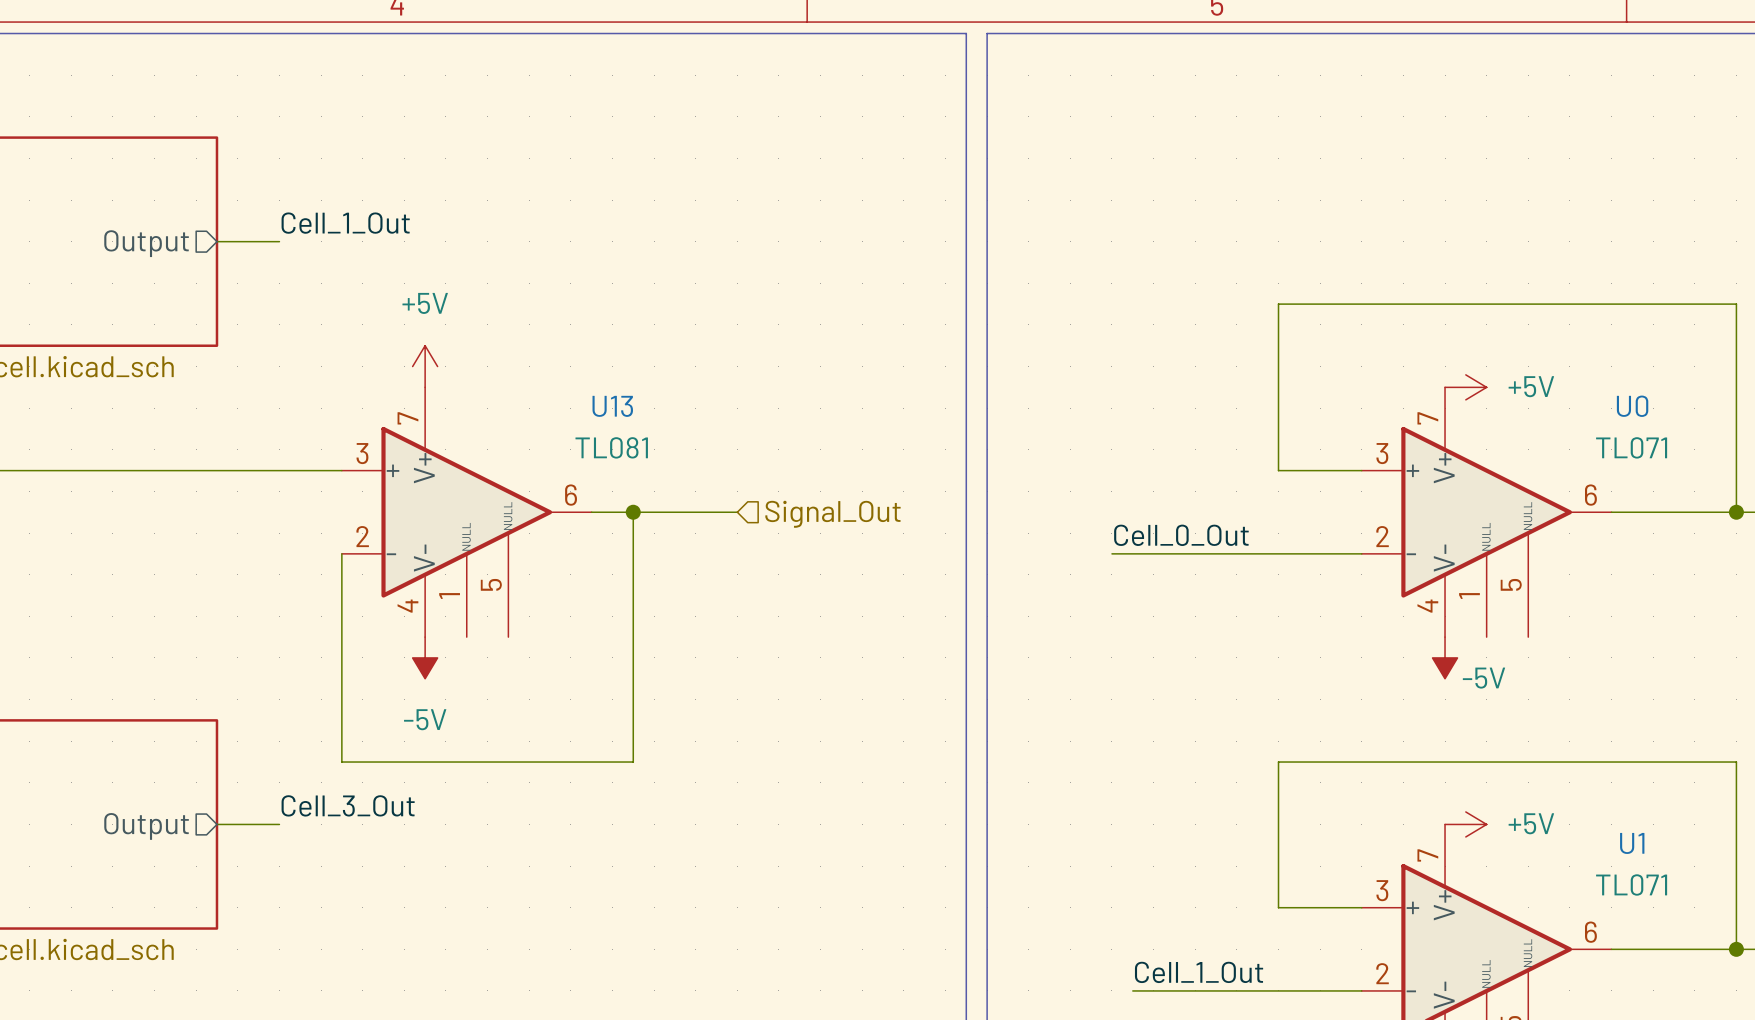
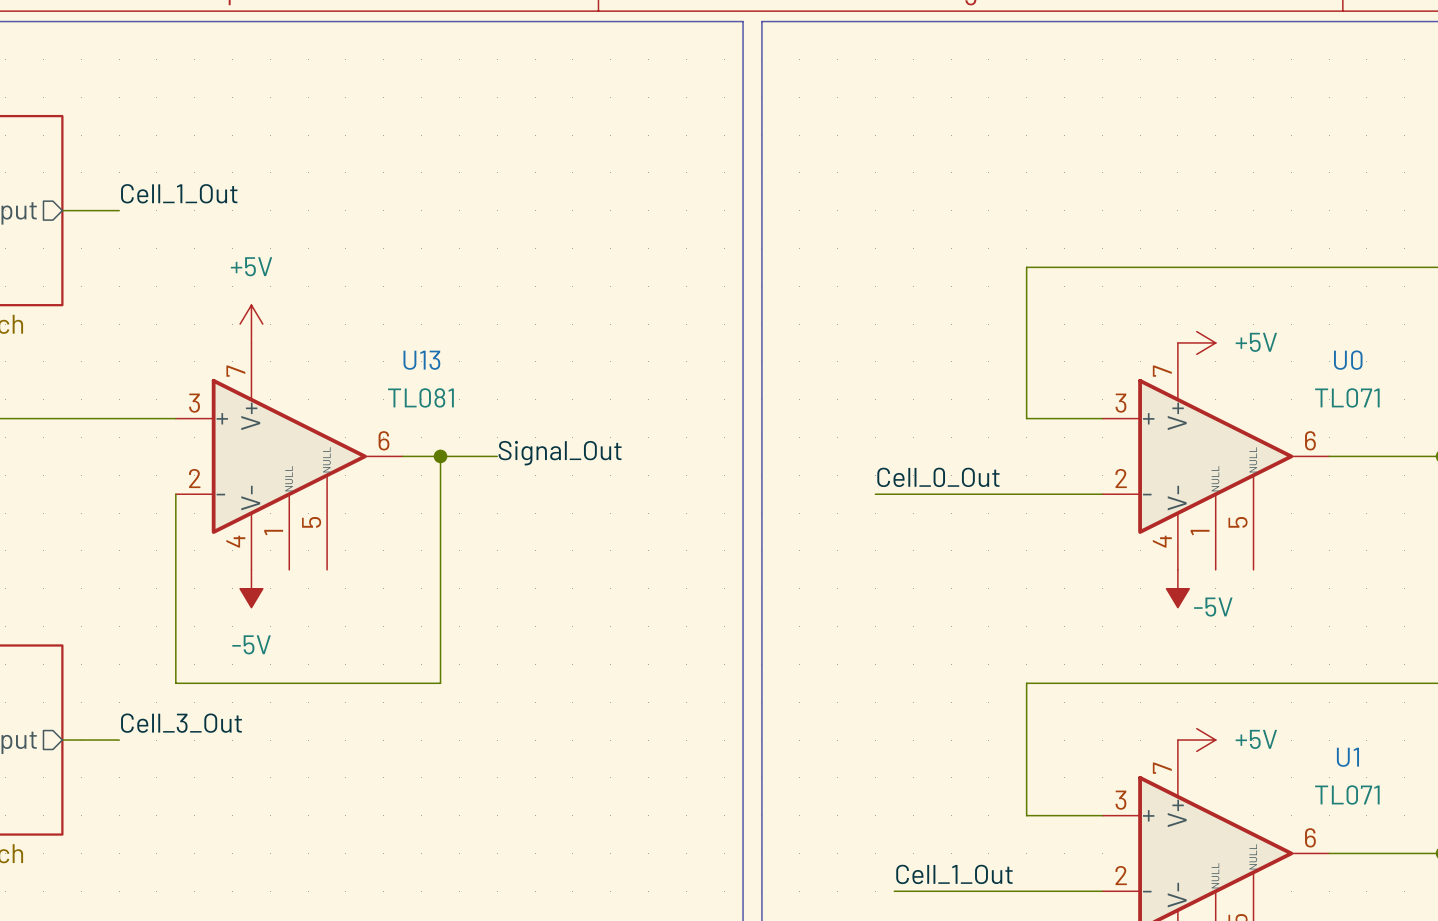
label: none -> Signal_Out (560, 453)
wire: (695, 512) (737, 512) -> none
hierarchical label: Signal_Out (832, 514) -> none

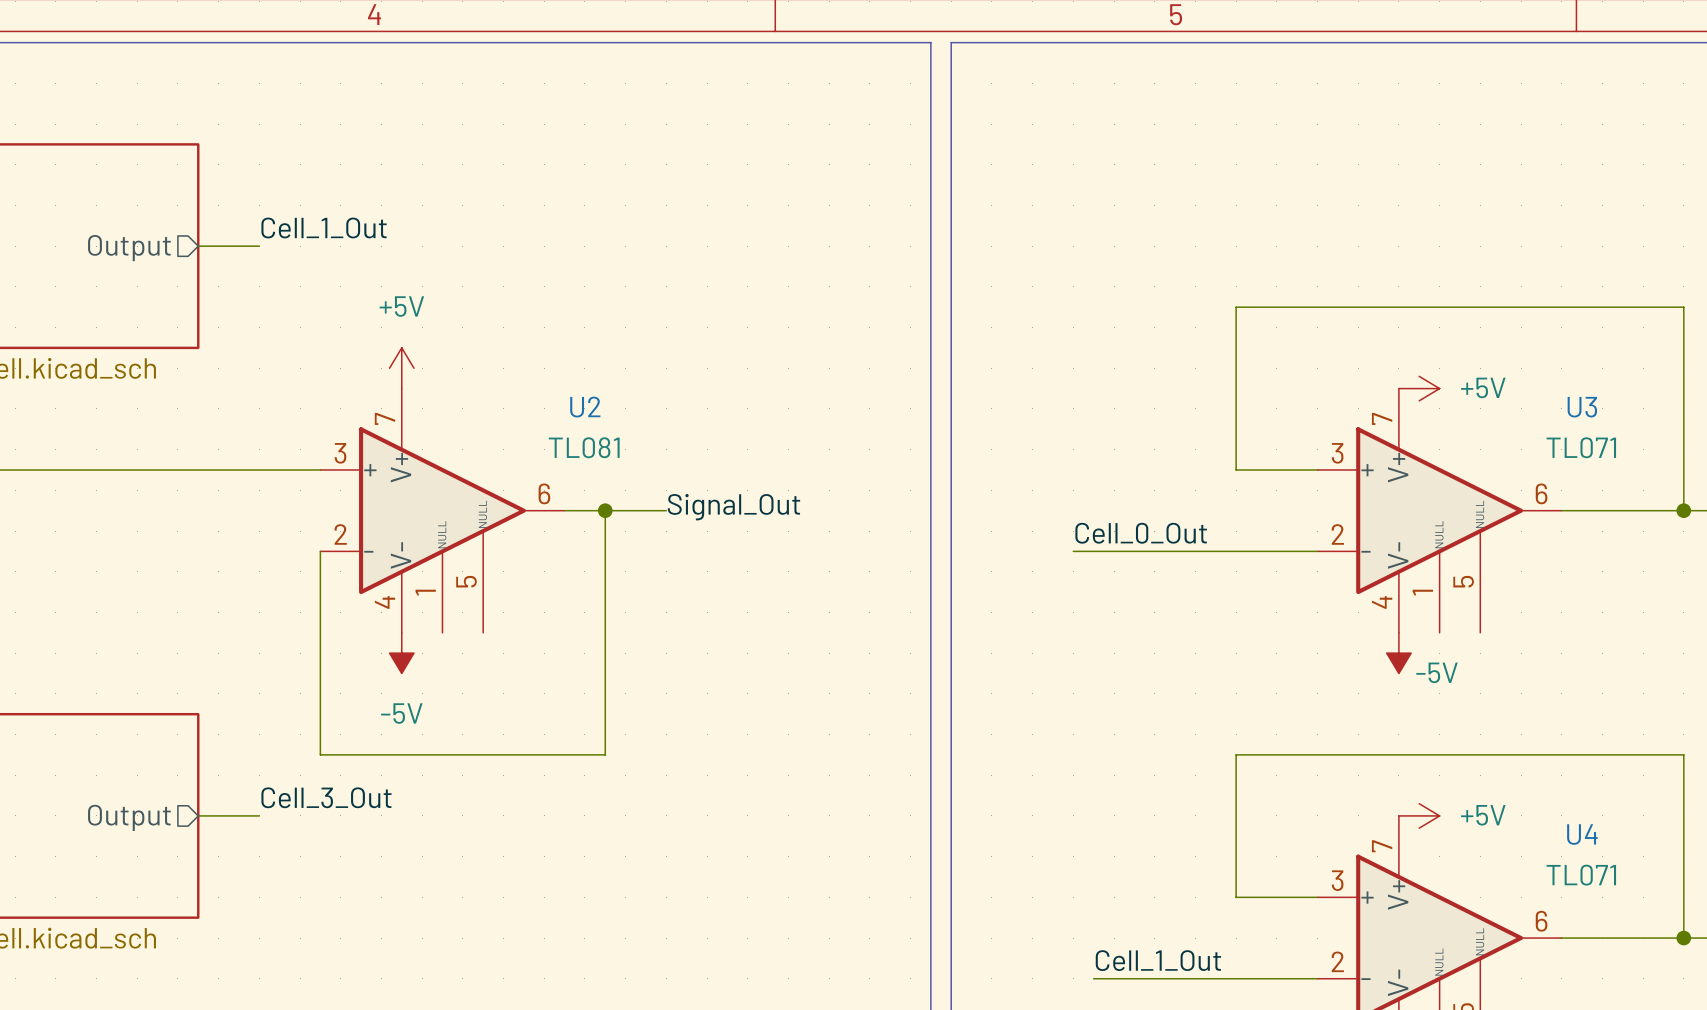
U13 name: U13 (421, 360) -> U2 (585, 407)
U0 name: U0 (1348, 360) -> U3 (1582, 407)
U1 name: U1 (1347, 757) -> U4 (1582, 834)

